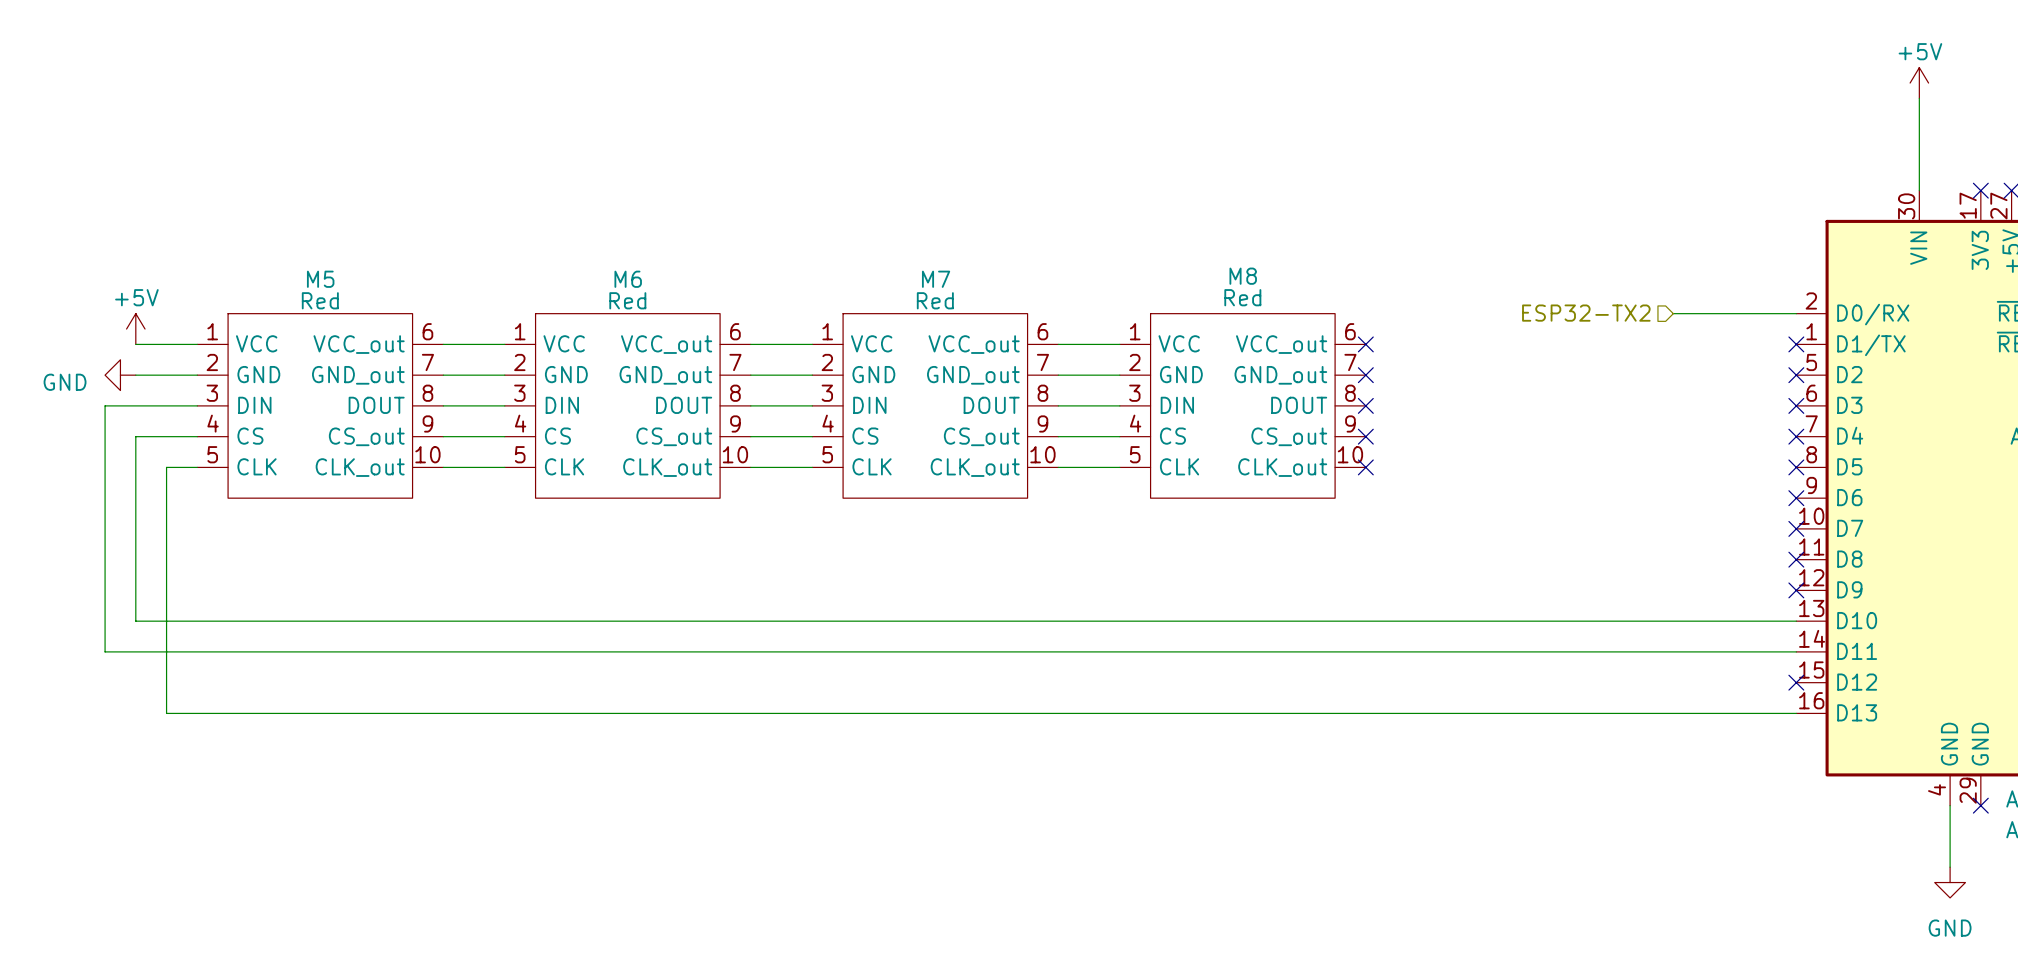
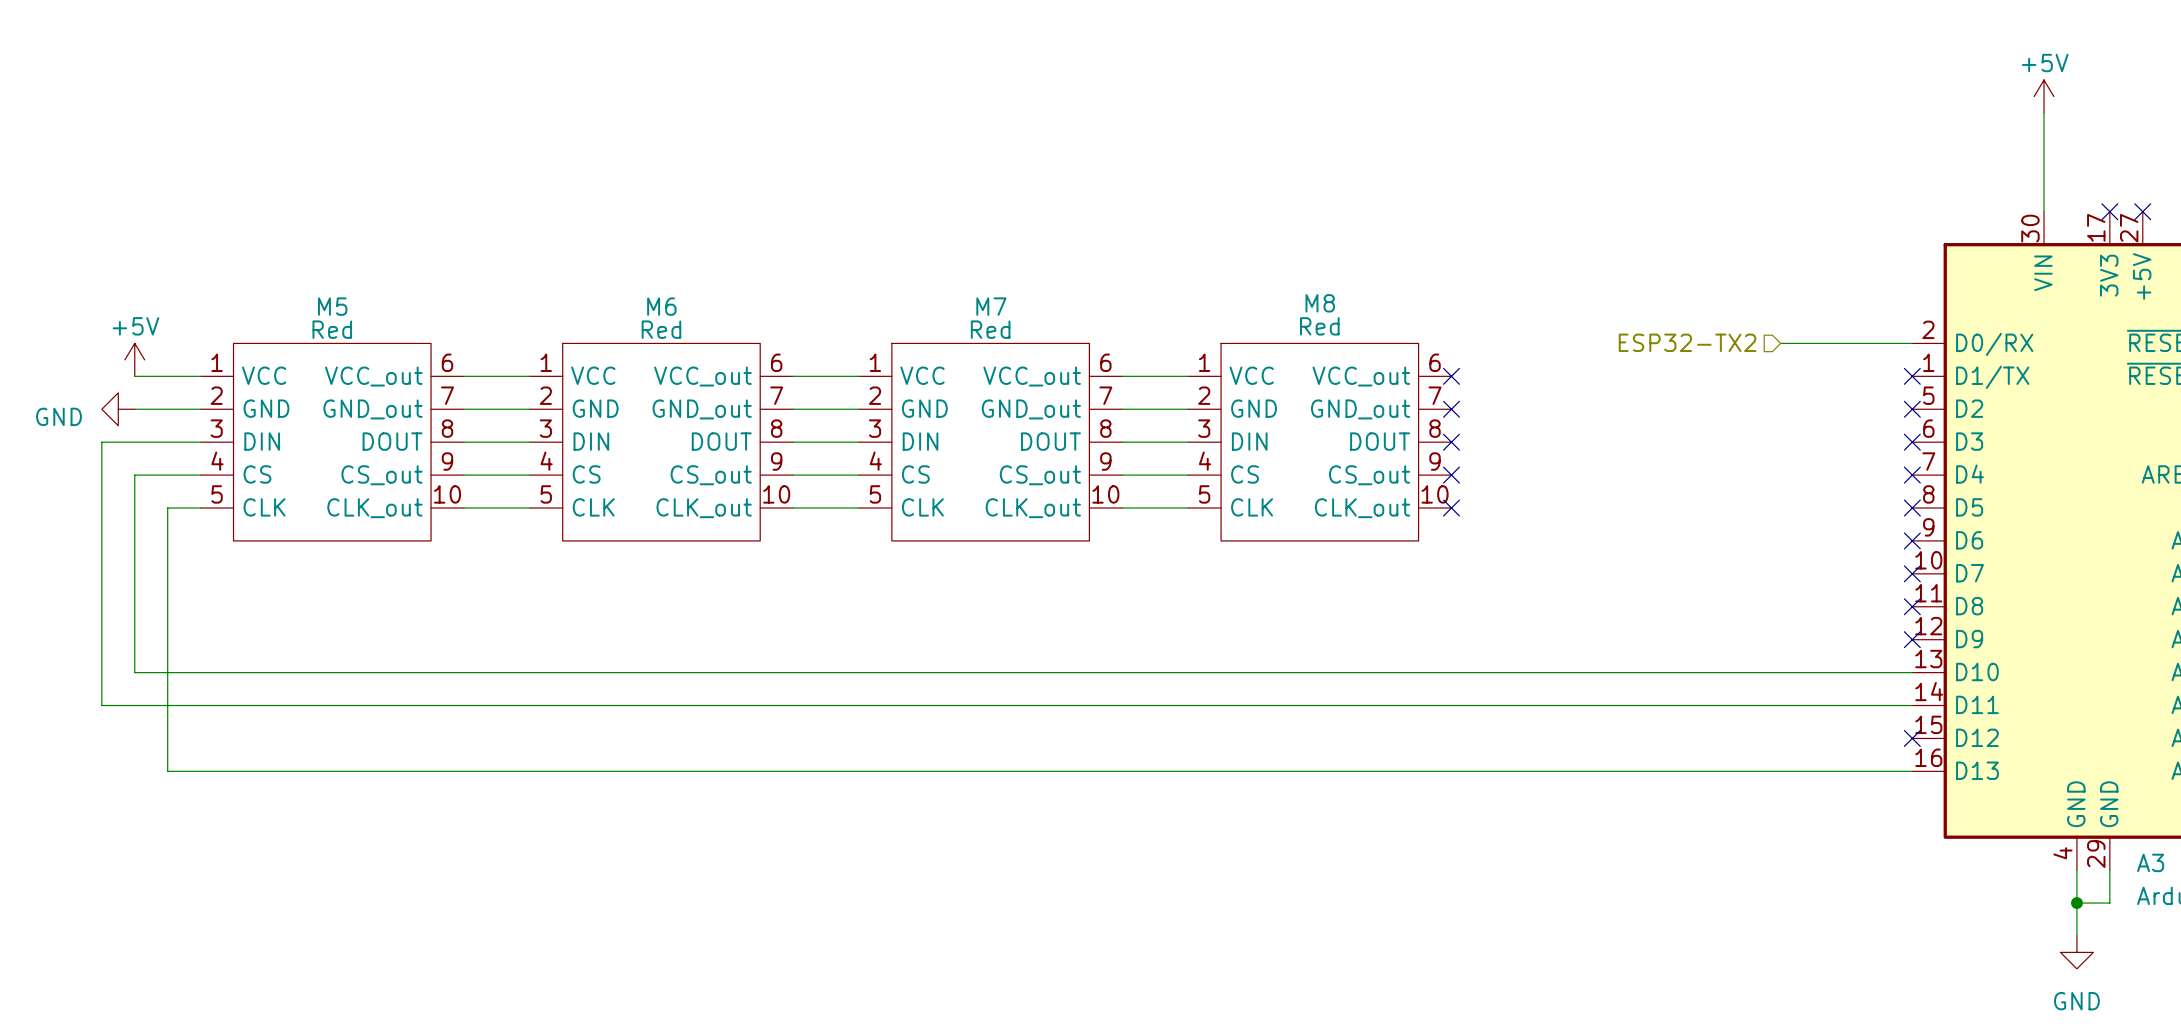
wire: none -> (2109, 870) (2109, 903) (2076, 903)
no-connect mark: (1980, 805) -> none
junction: none -> (2076, 903)

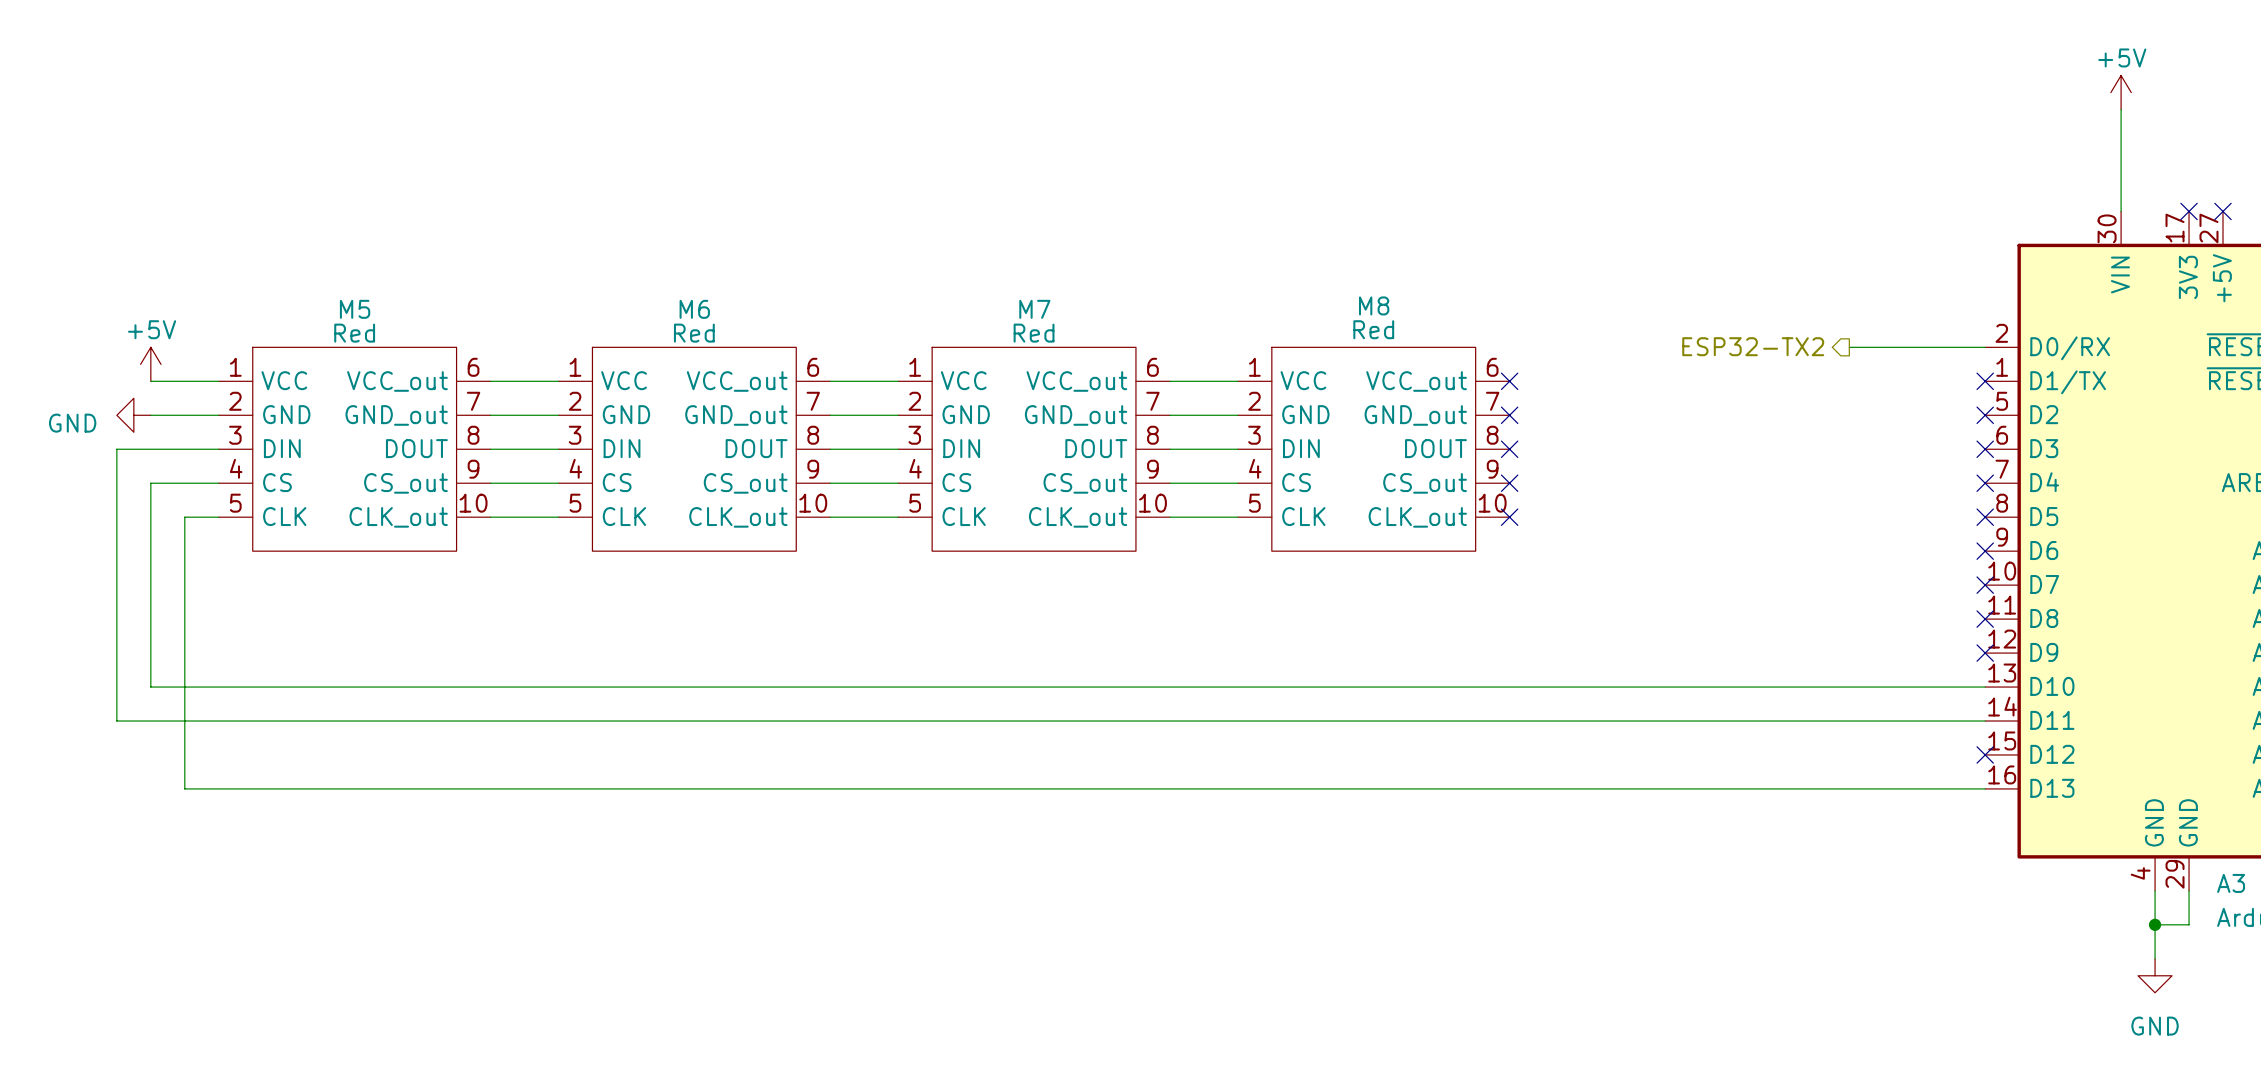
hierarchical label shape: input (1687, 342) -> output (1753, 346)

